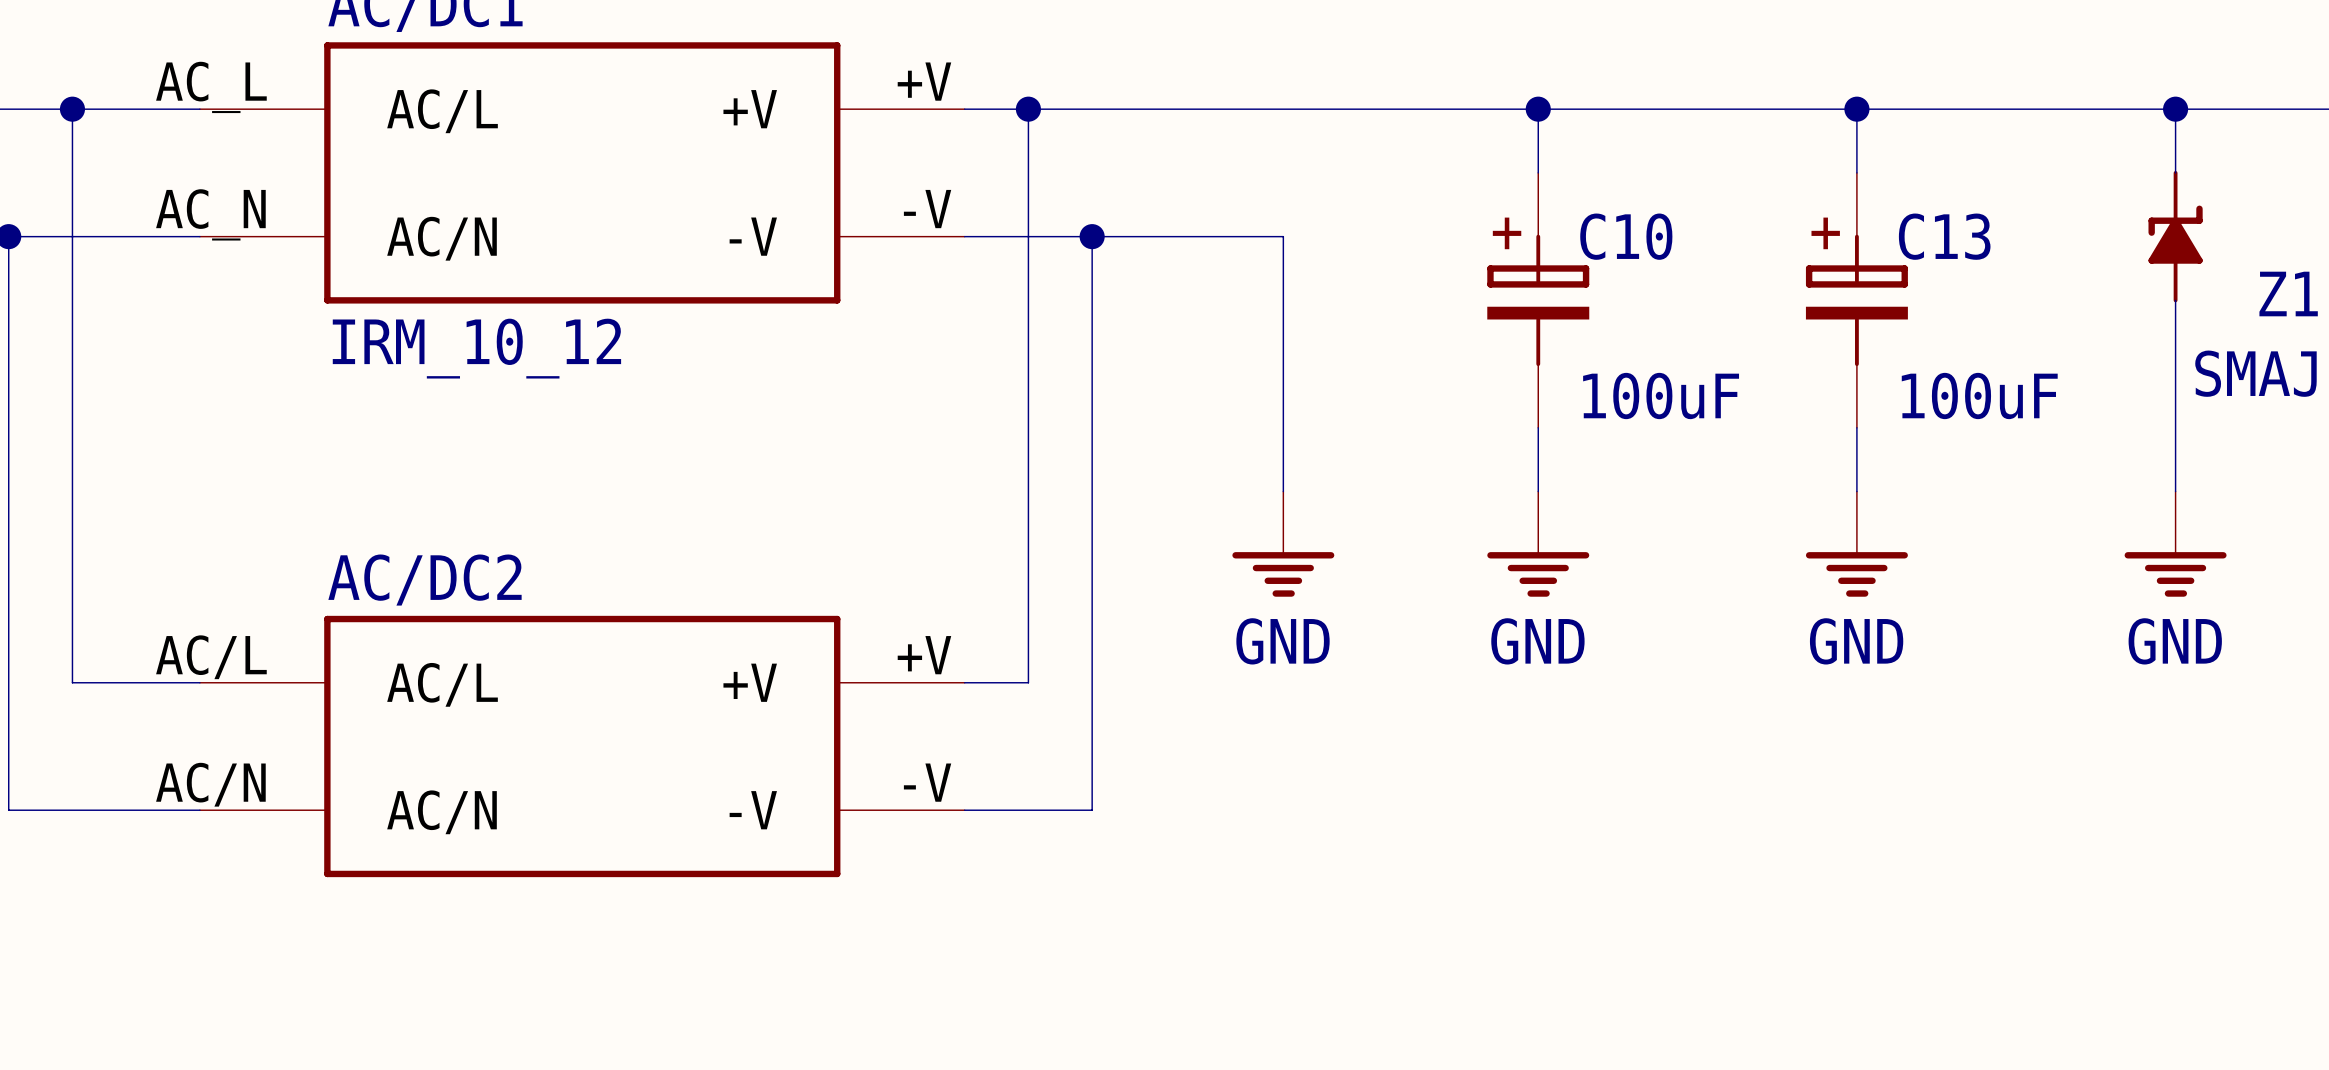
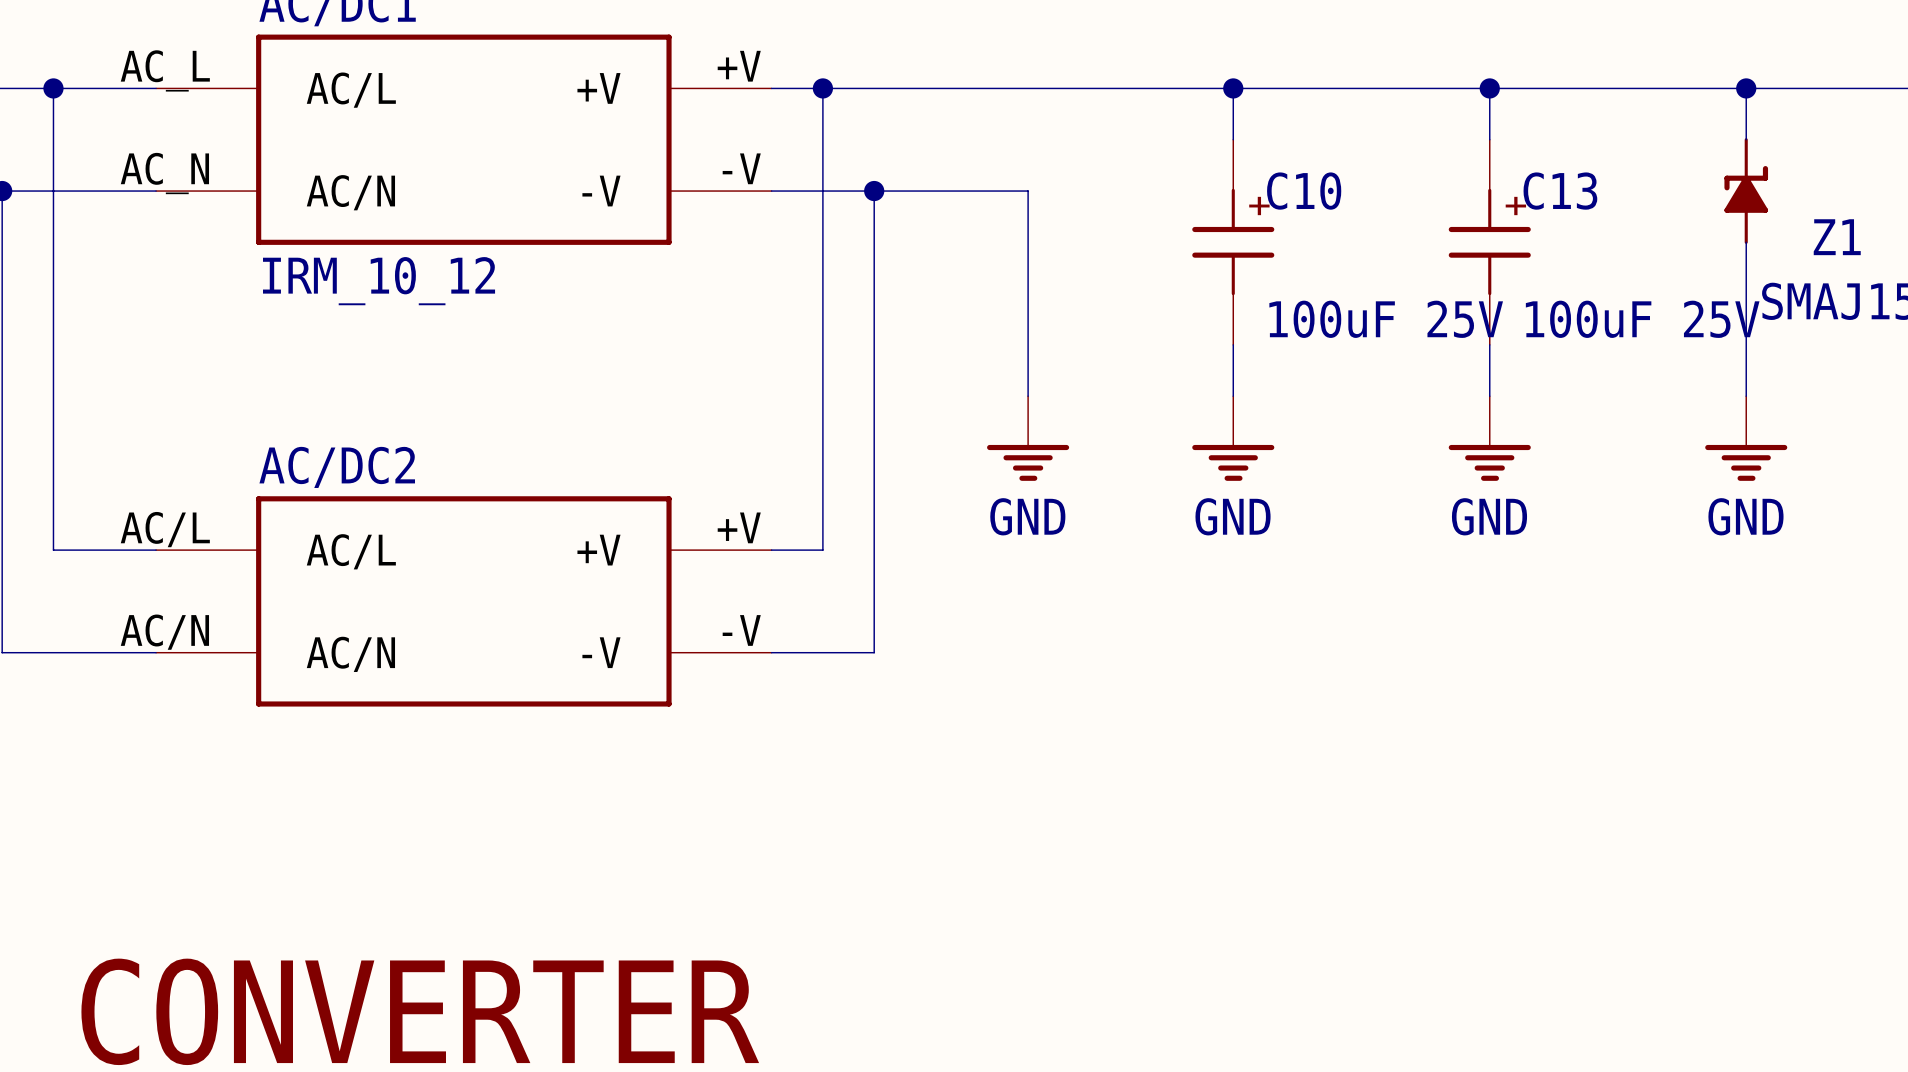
C10 symbol: [1487, 172, 1590, 428] -> [1192, 139, 1275, 345]
C13 symbol: [1805, 172, 1908, 428] -> [1448, 139, 1531, 345]
C10 value: 100uF (1661, 396) -> 100uF 25V (1386, 319)
C13 value: 100uF (1979, 396) -> 100uF 25V (1642, 319)

